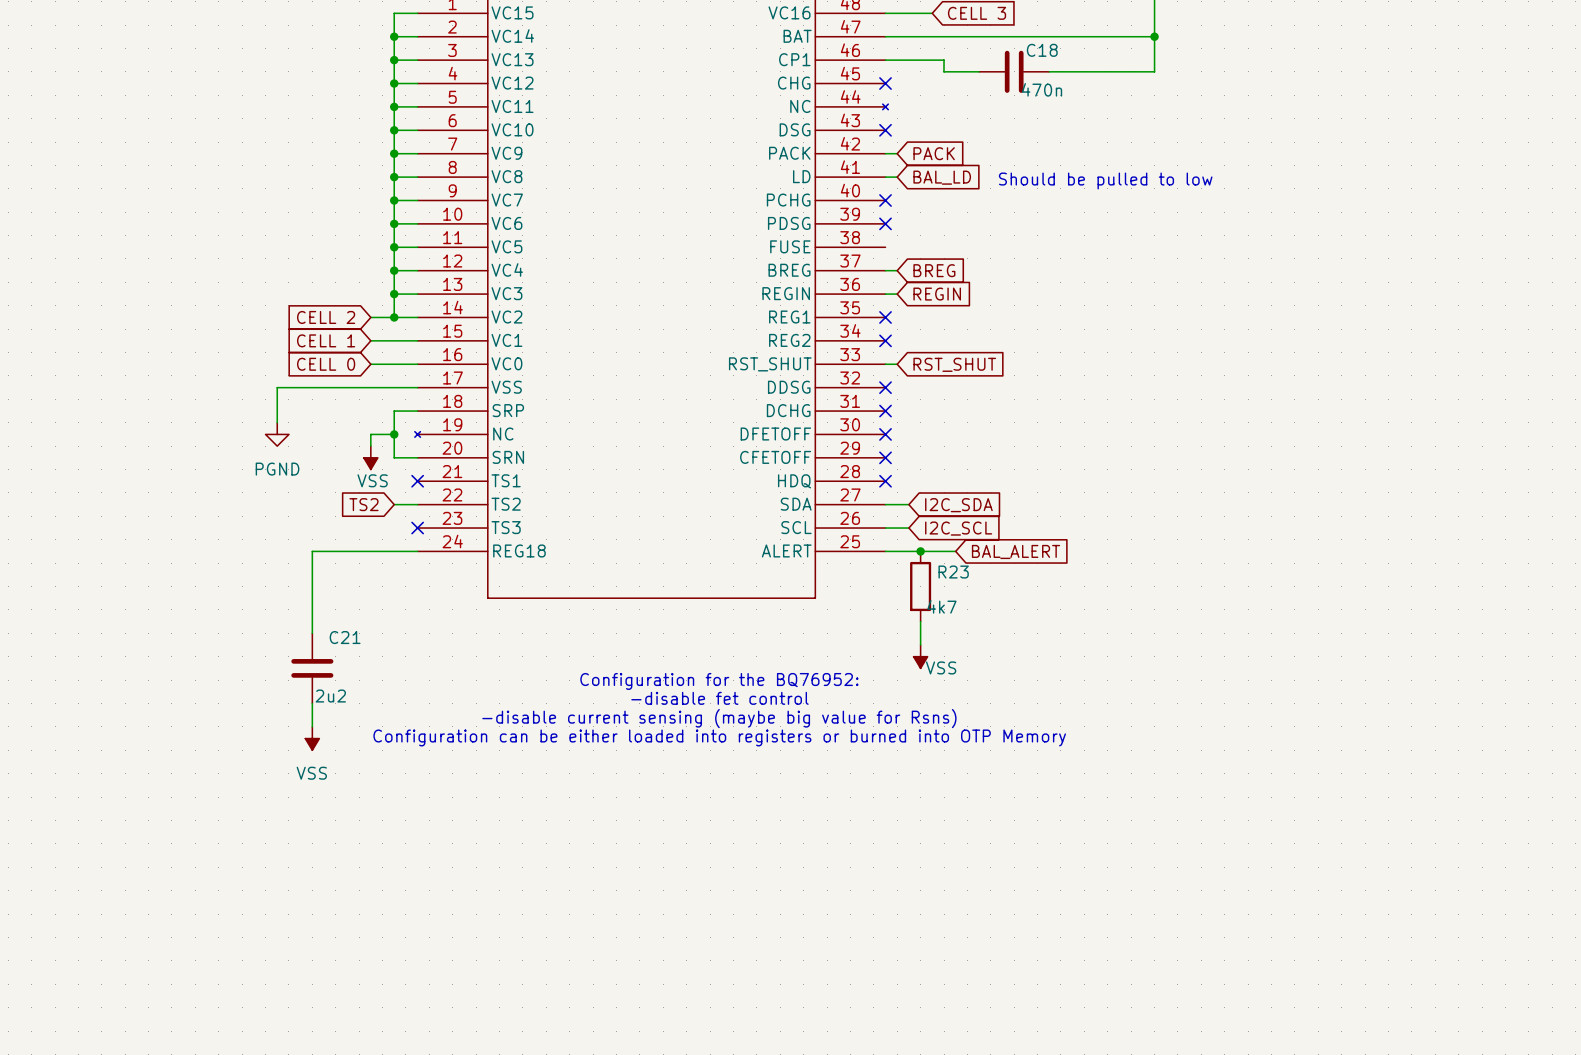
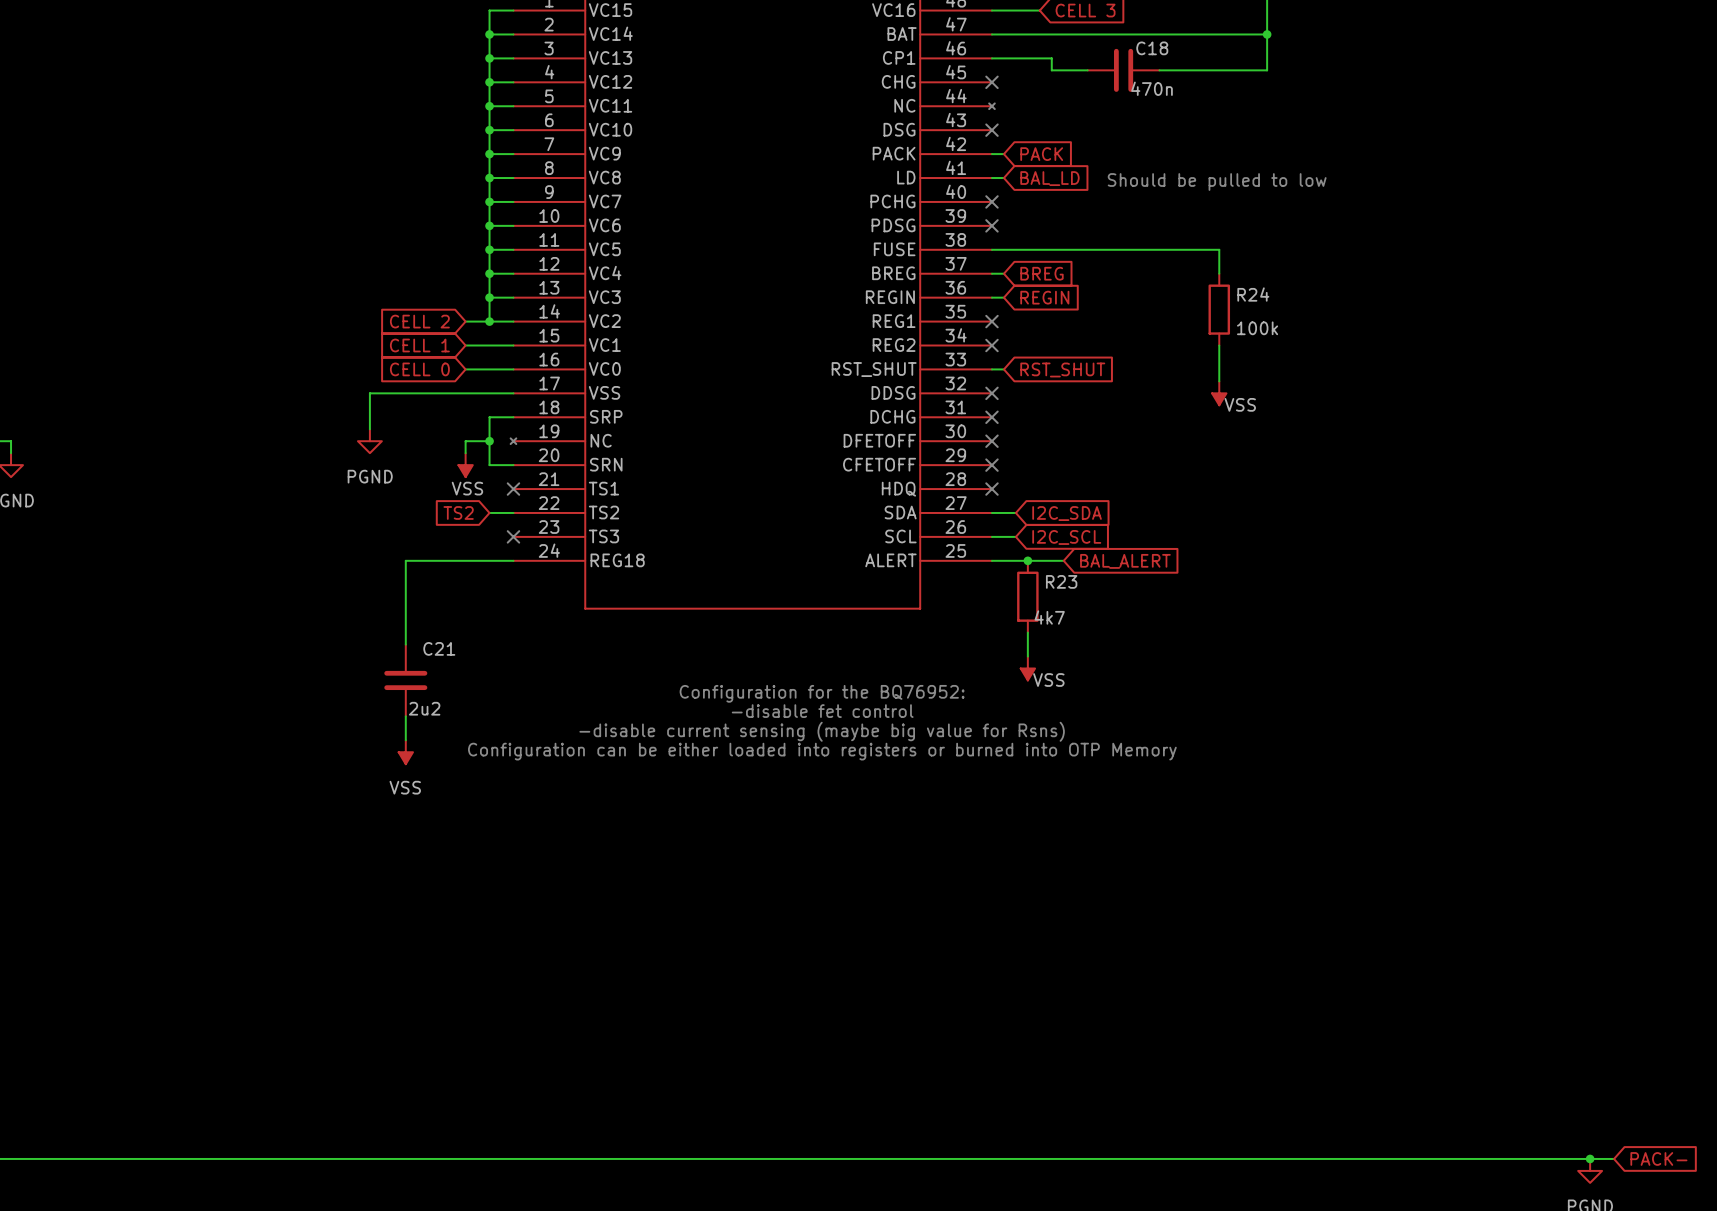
wire: none -> (991, 249) (1219, 249) (1219, 273)
R24: none -> 100k (1219, 309)
wire: none -> (1219, 345) (1219, 381)
power symbol: none -> VSS (1219, 393)

